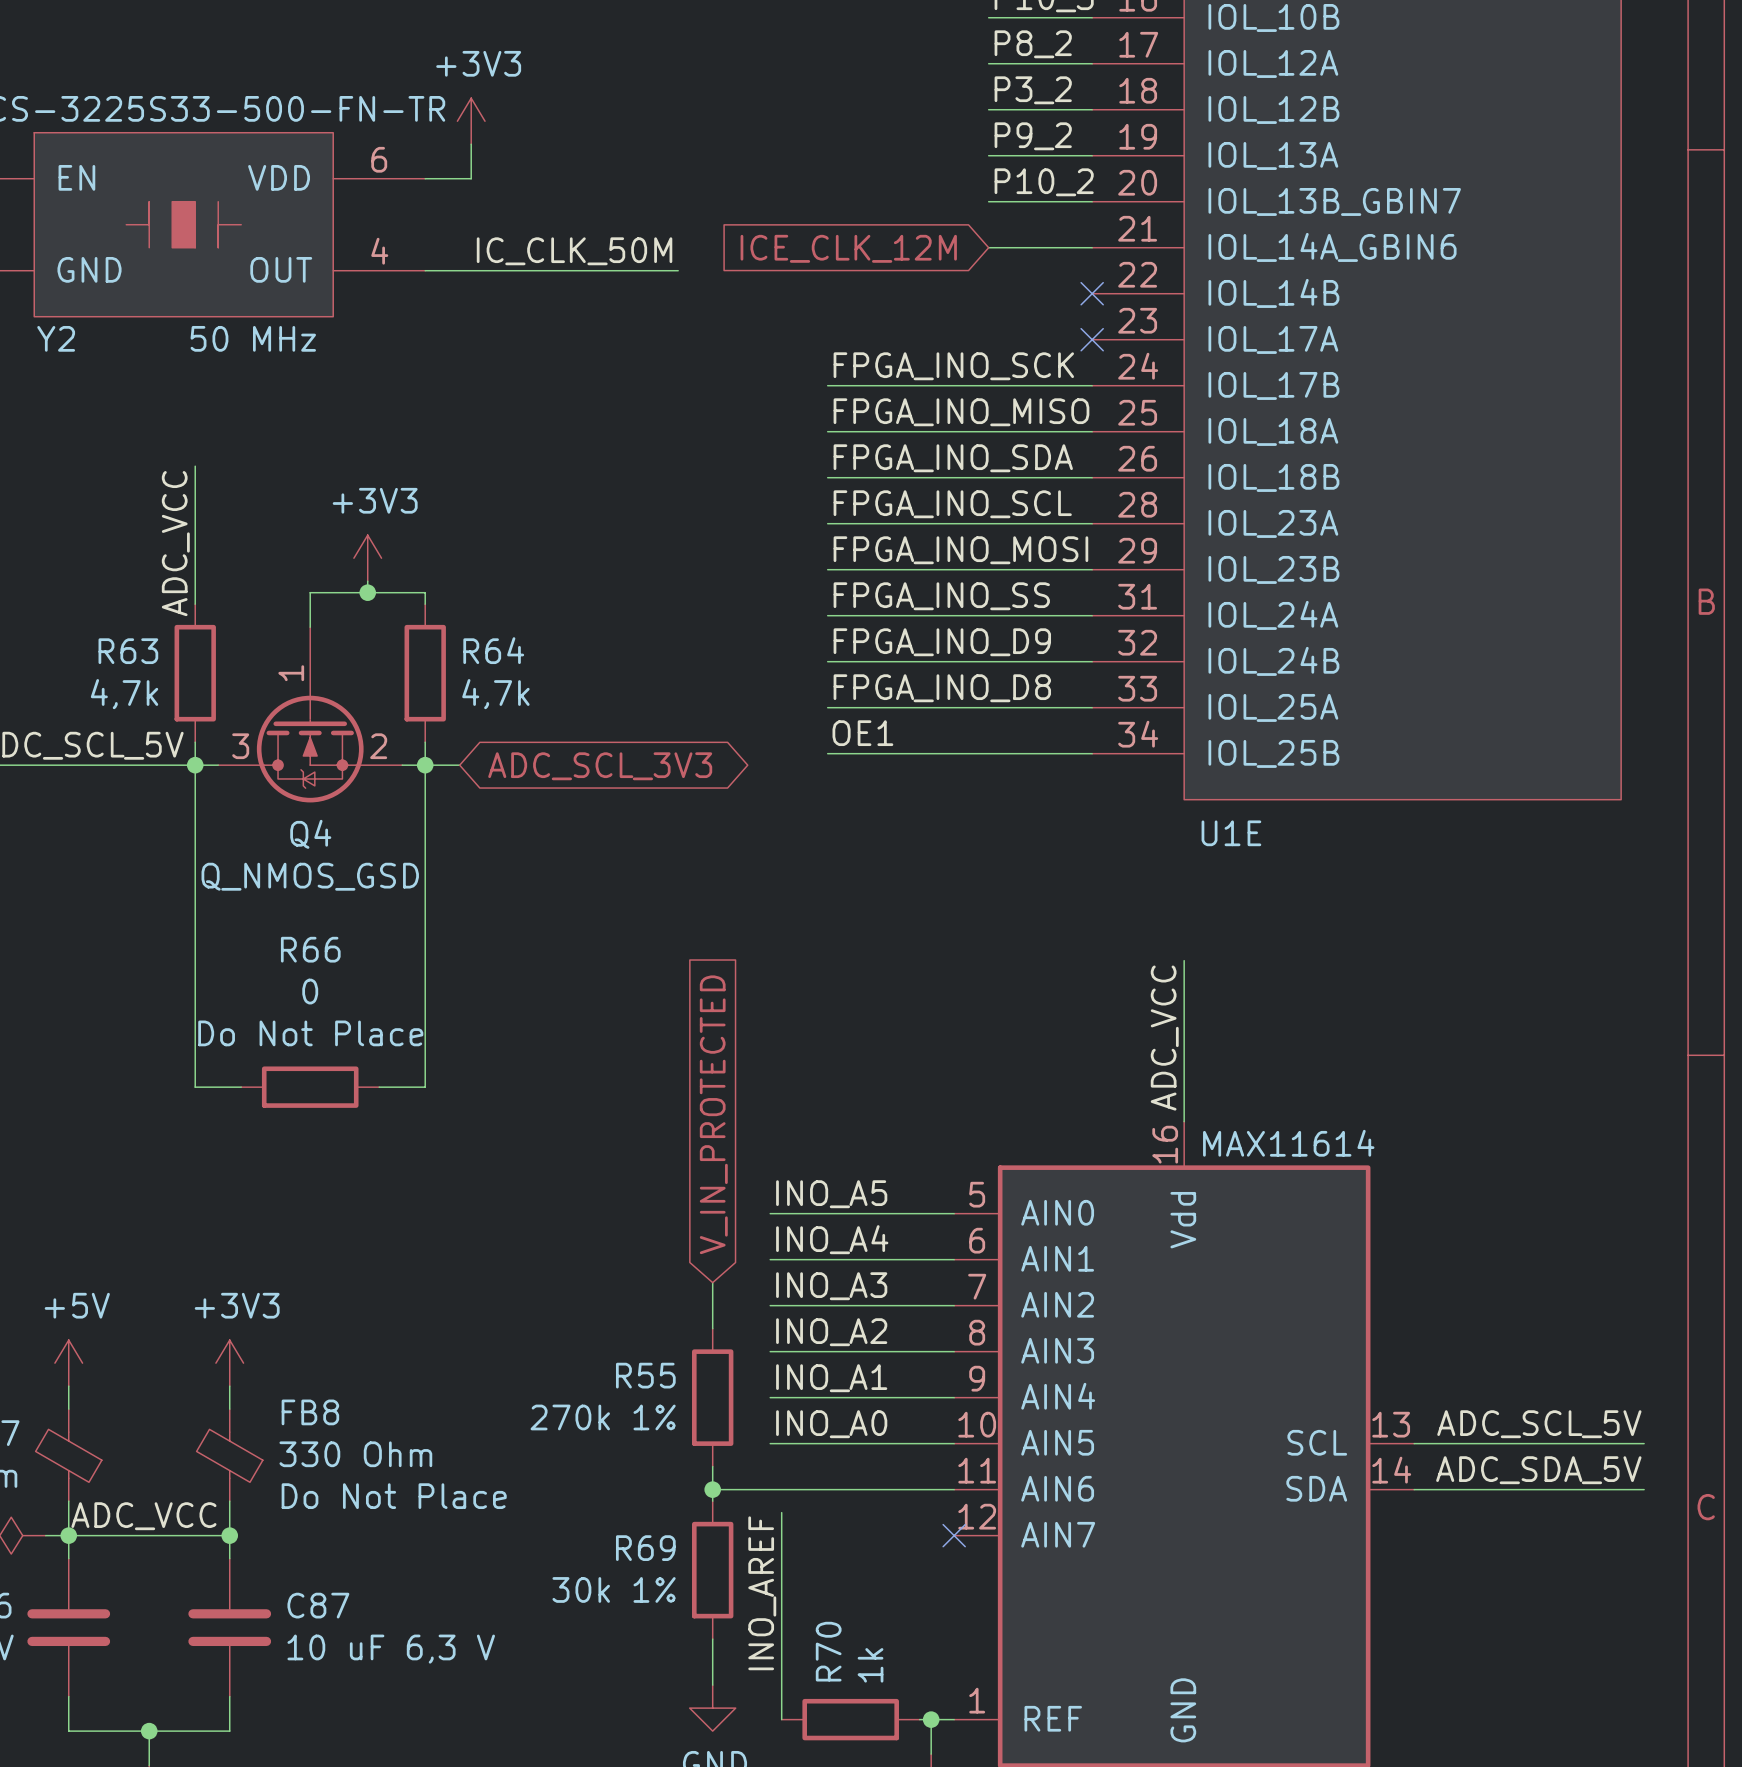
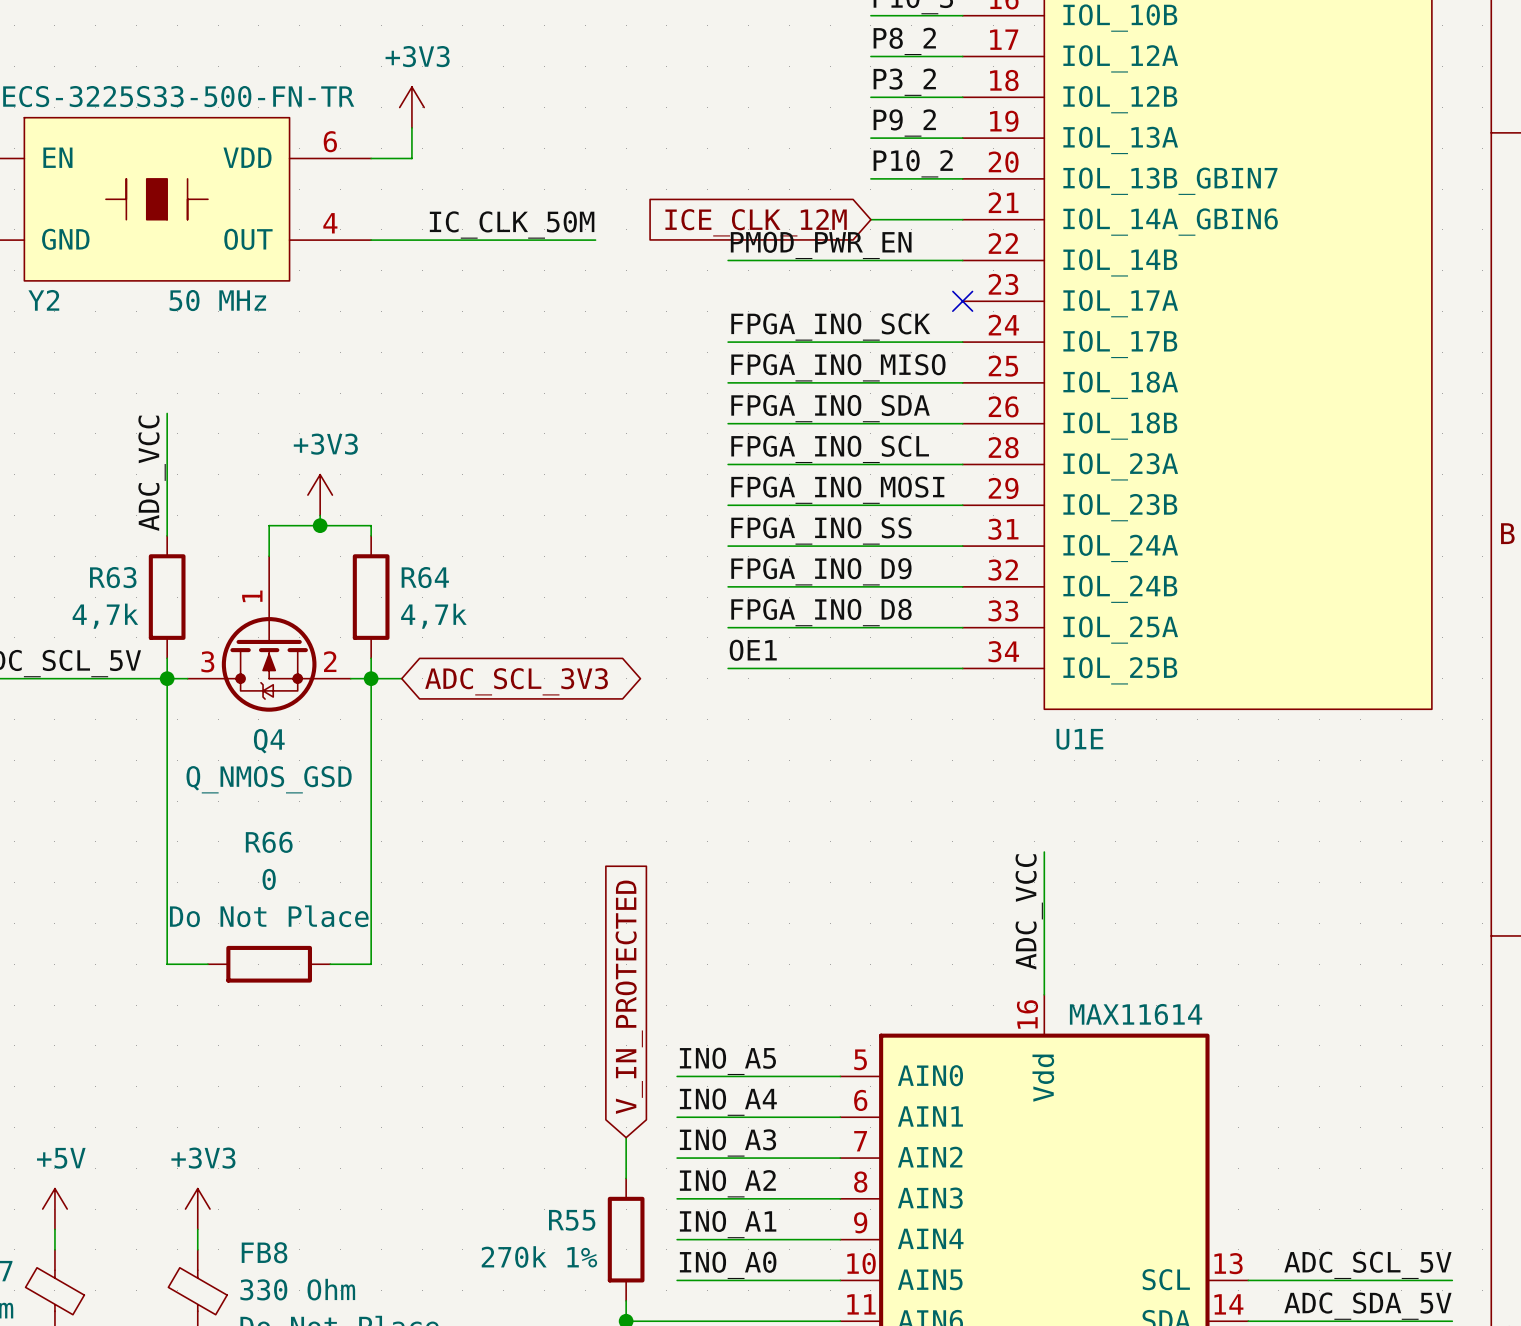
label: none -> PMOD_PWR_EN (821, 245)
wire: none -> (728, 260) (962, 260)
no-connect mark: (1092, 293) -> none

